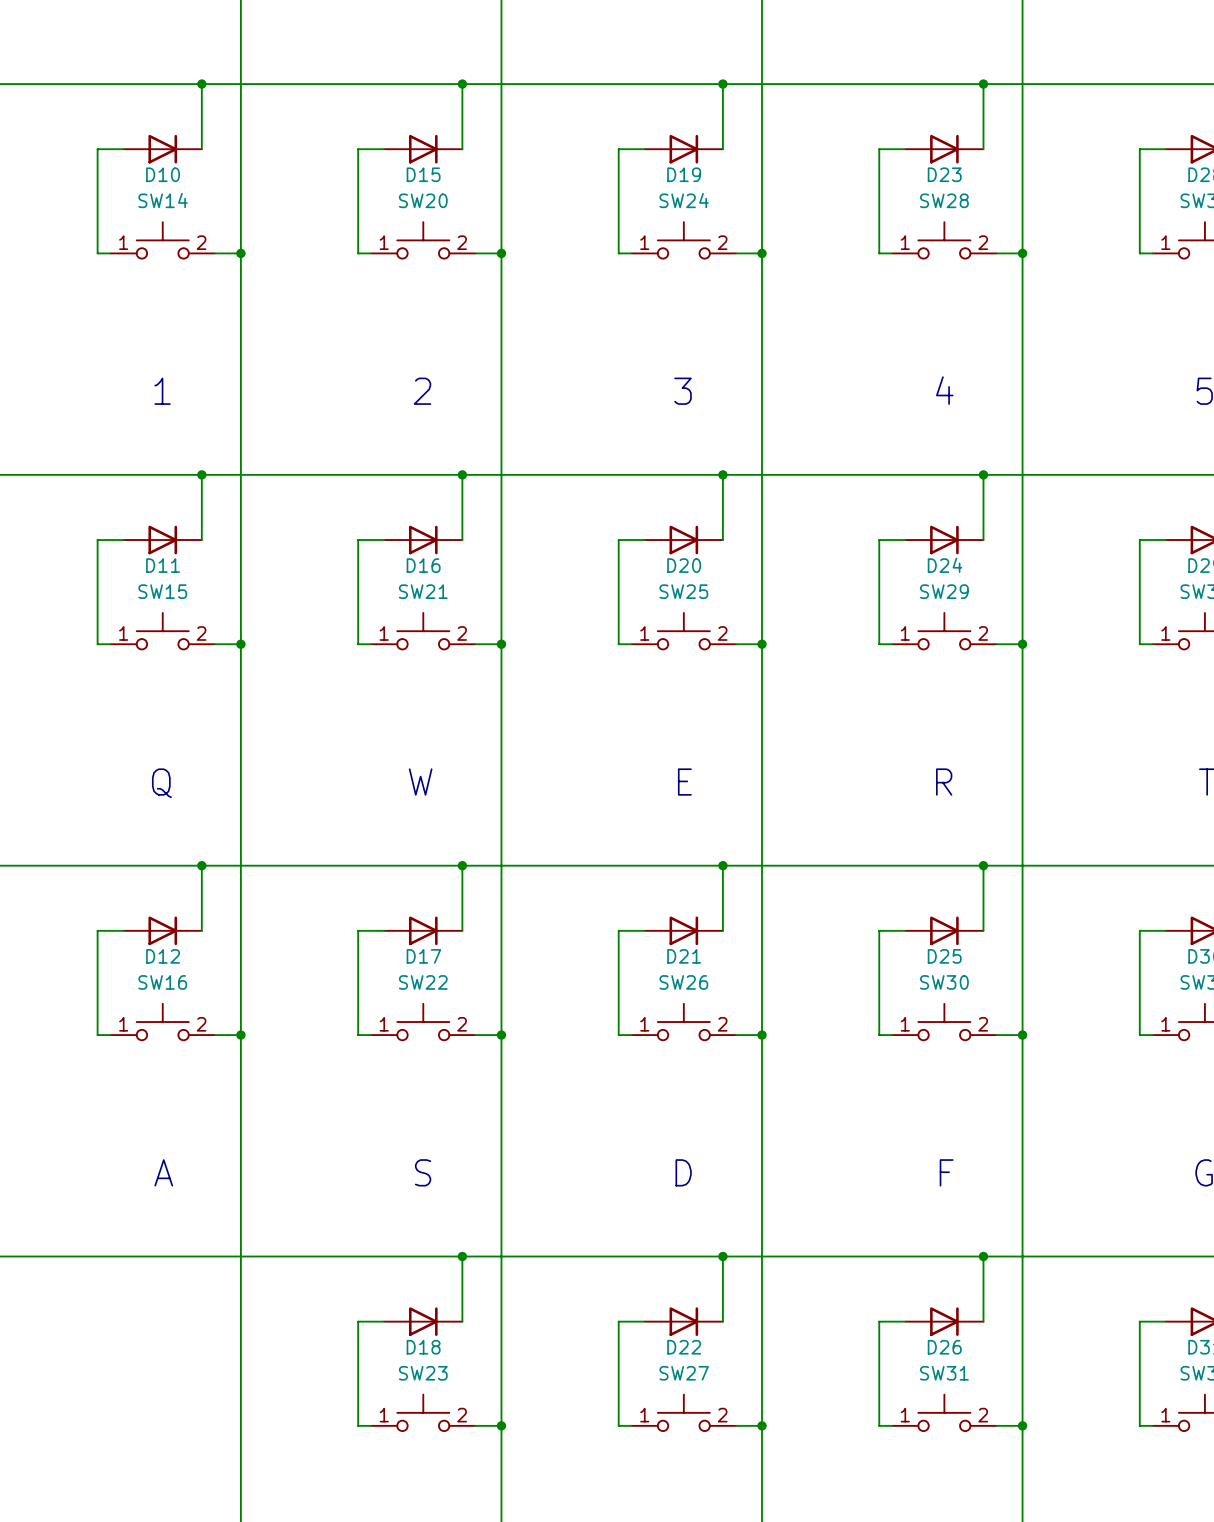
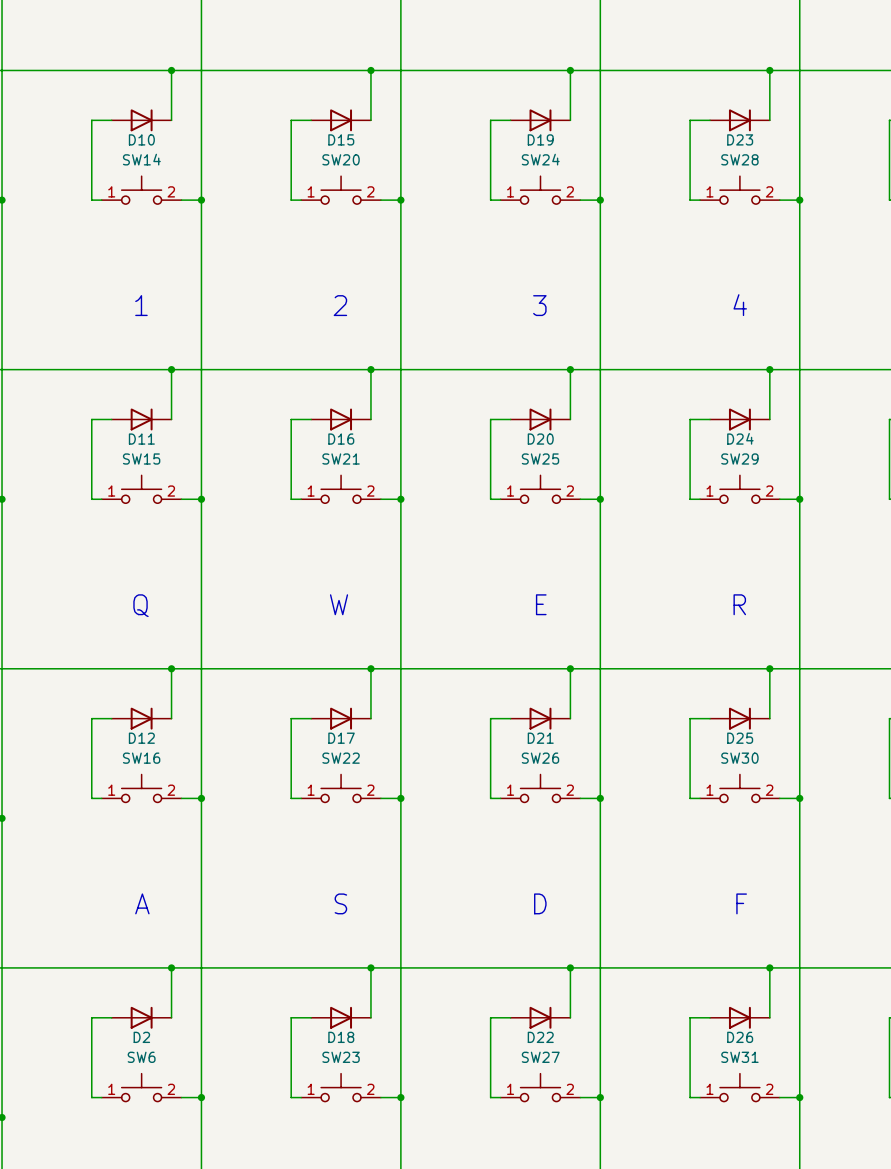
wire: none -> (171, 967) (171, 1017)
junction: none -> (171, 967)
wire: none -> (111, 1017) (91, 1017) (91, 1097) (101, 1097)
D2: none -> (141, 1017)
SW6: none -> (141, 1087)
wire: none -> (181, 1097) (201, 1097)
junction: none -> (201, 1097)

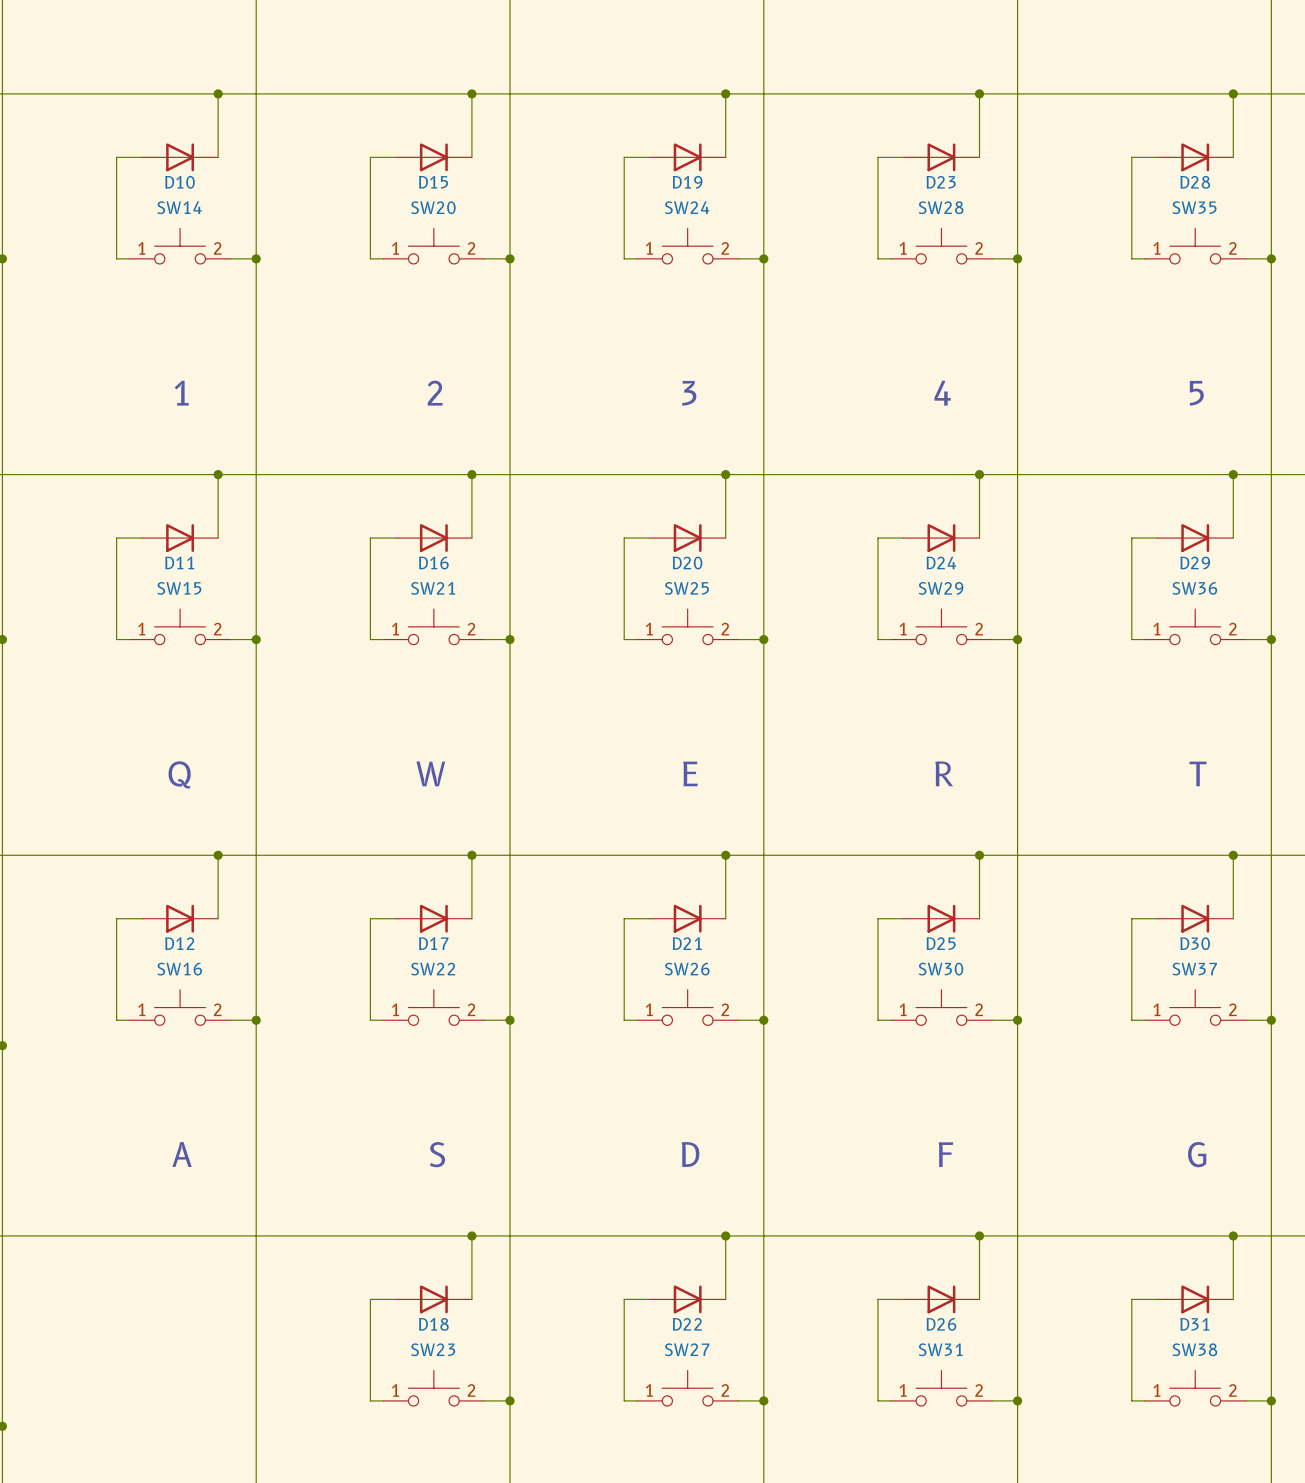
wire: (171, 967) (171, 1017) -> none
junction: (171, 967) -> none
wire: (111, 1017) (91, 1017) (91, 1097) (101, 1097) -> none
D2: (141, 1017) -> none
SW6: (141, 1087) -> none
wire: (181, 1097) (201, 1097) -> none
junction: (201, 1097) -> none

